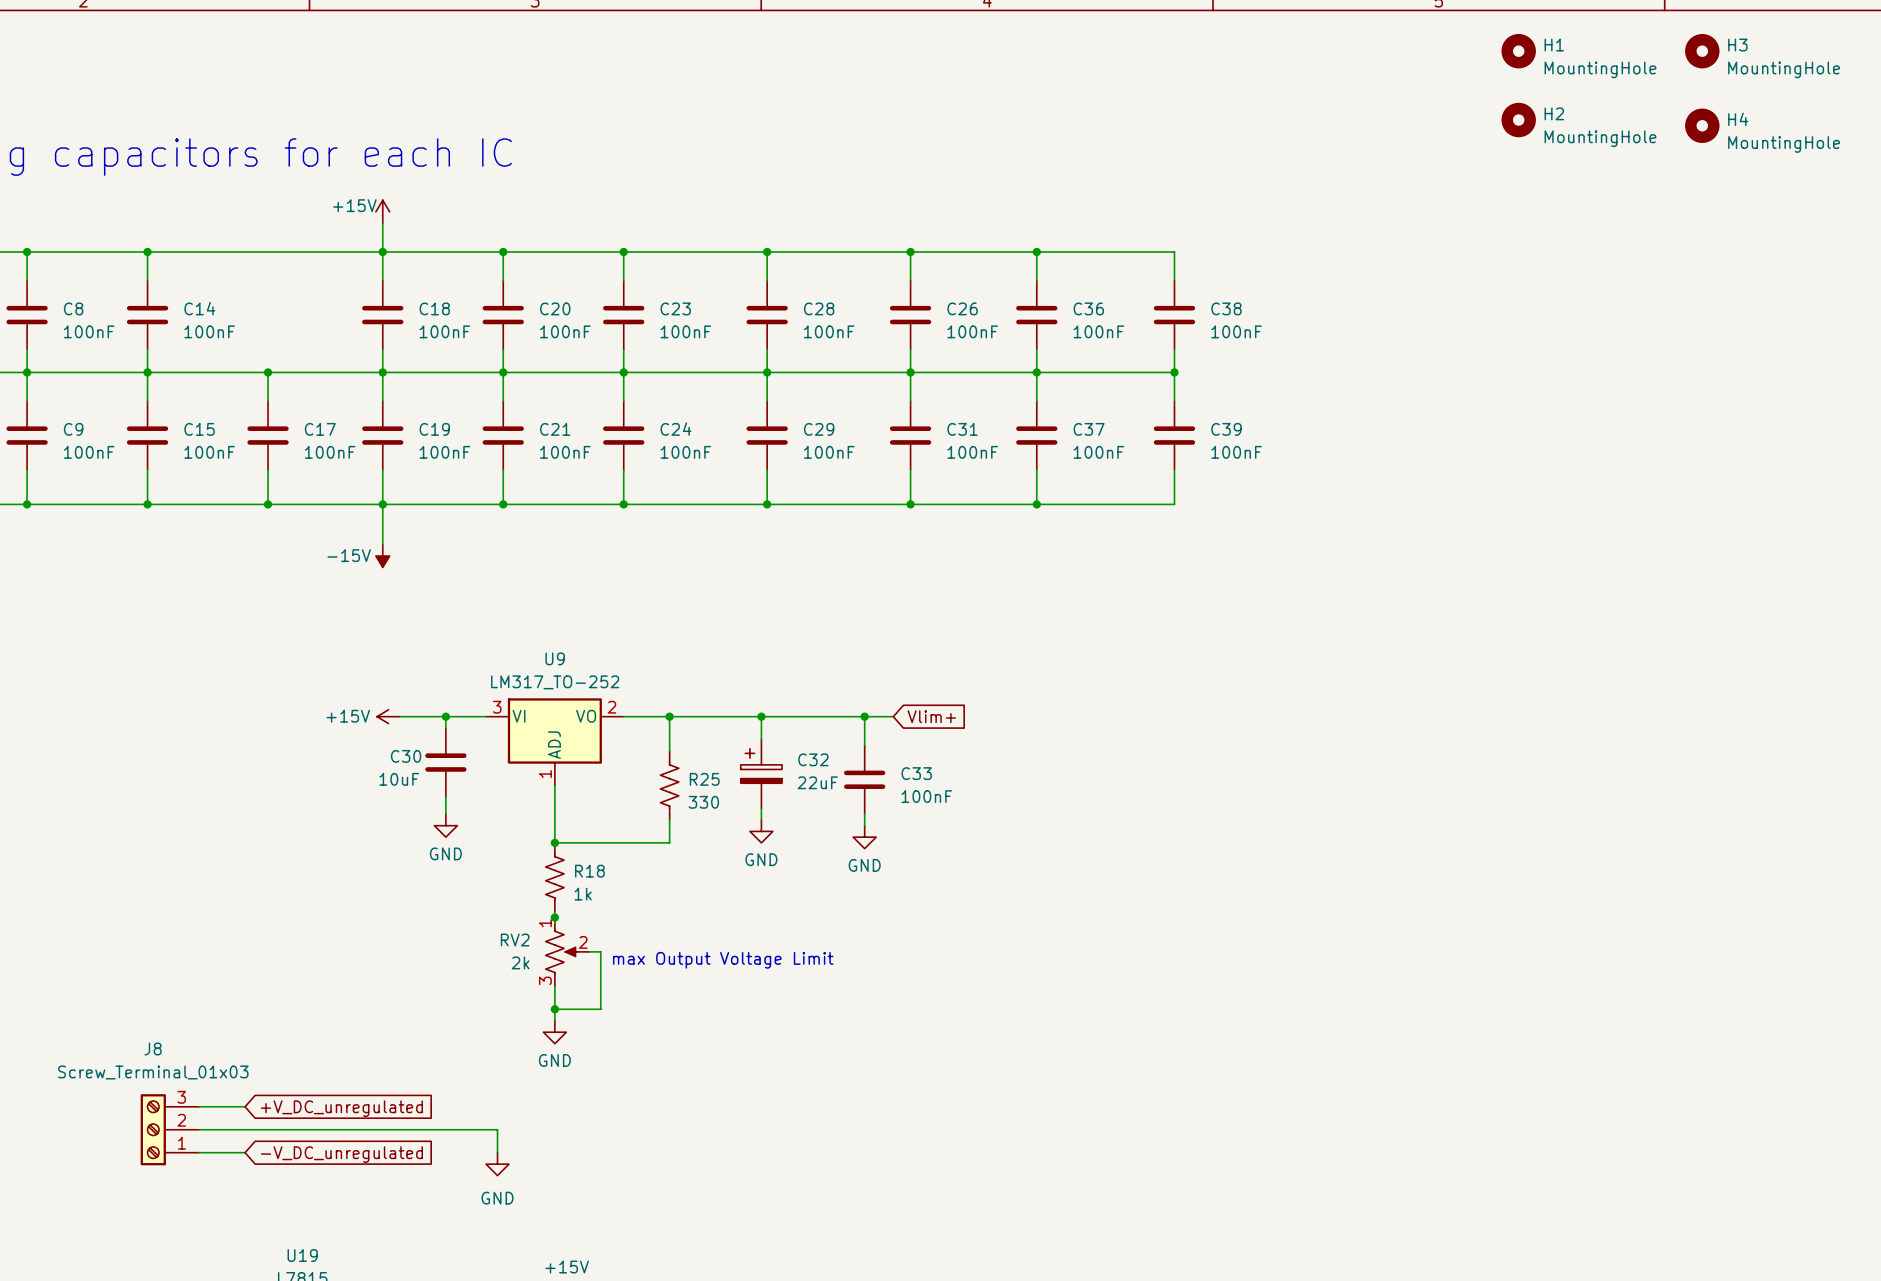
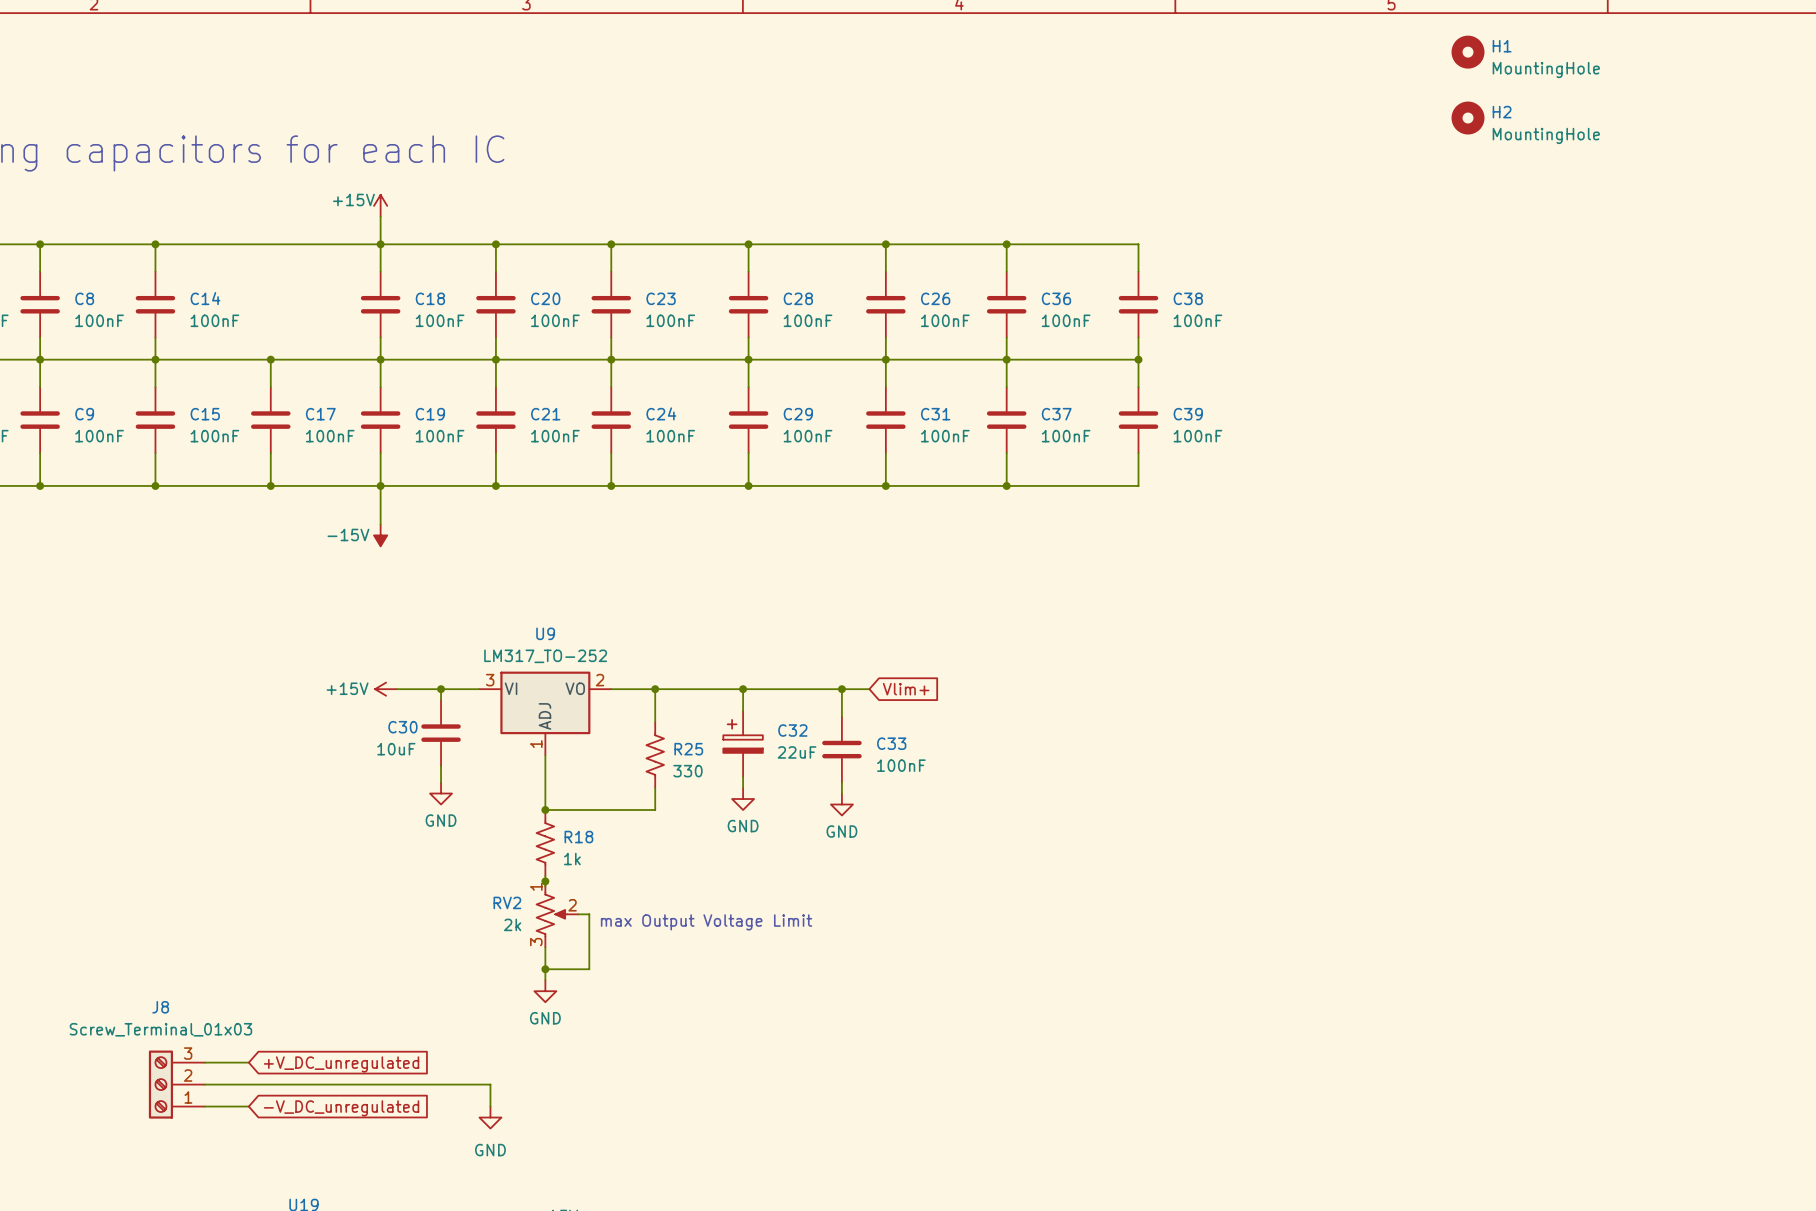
H3: MountingHole (1702, 51) -> none
H4: MountingHole (1702, 125) -> none

